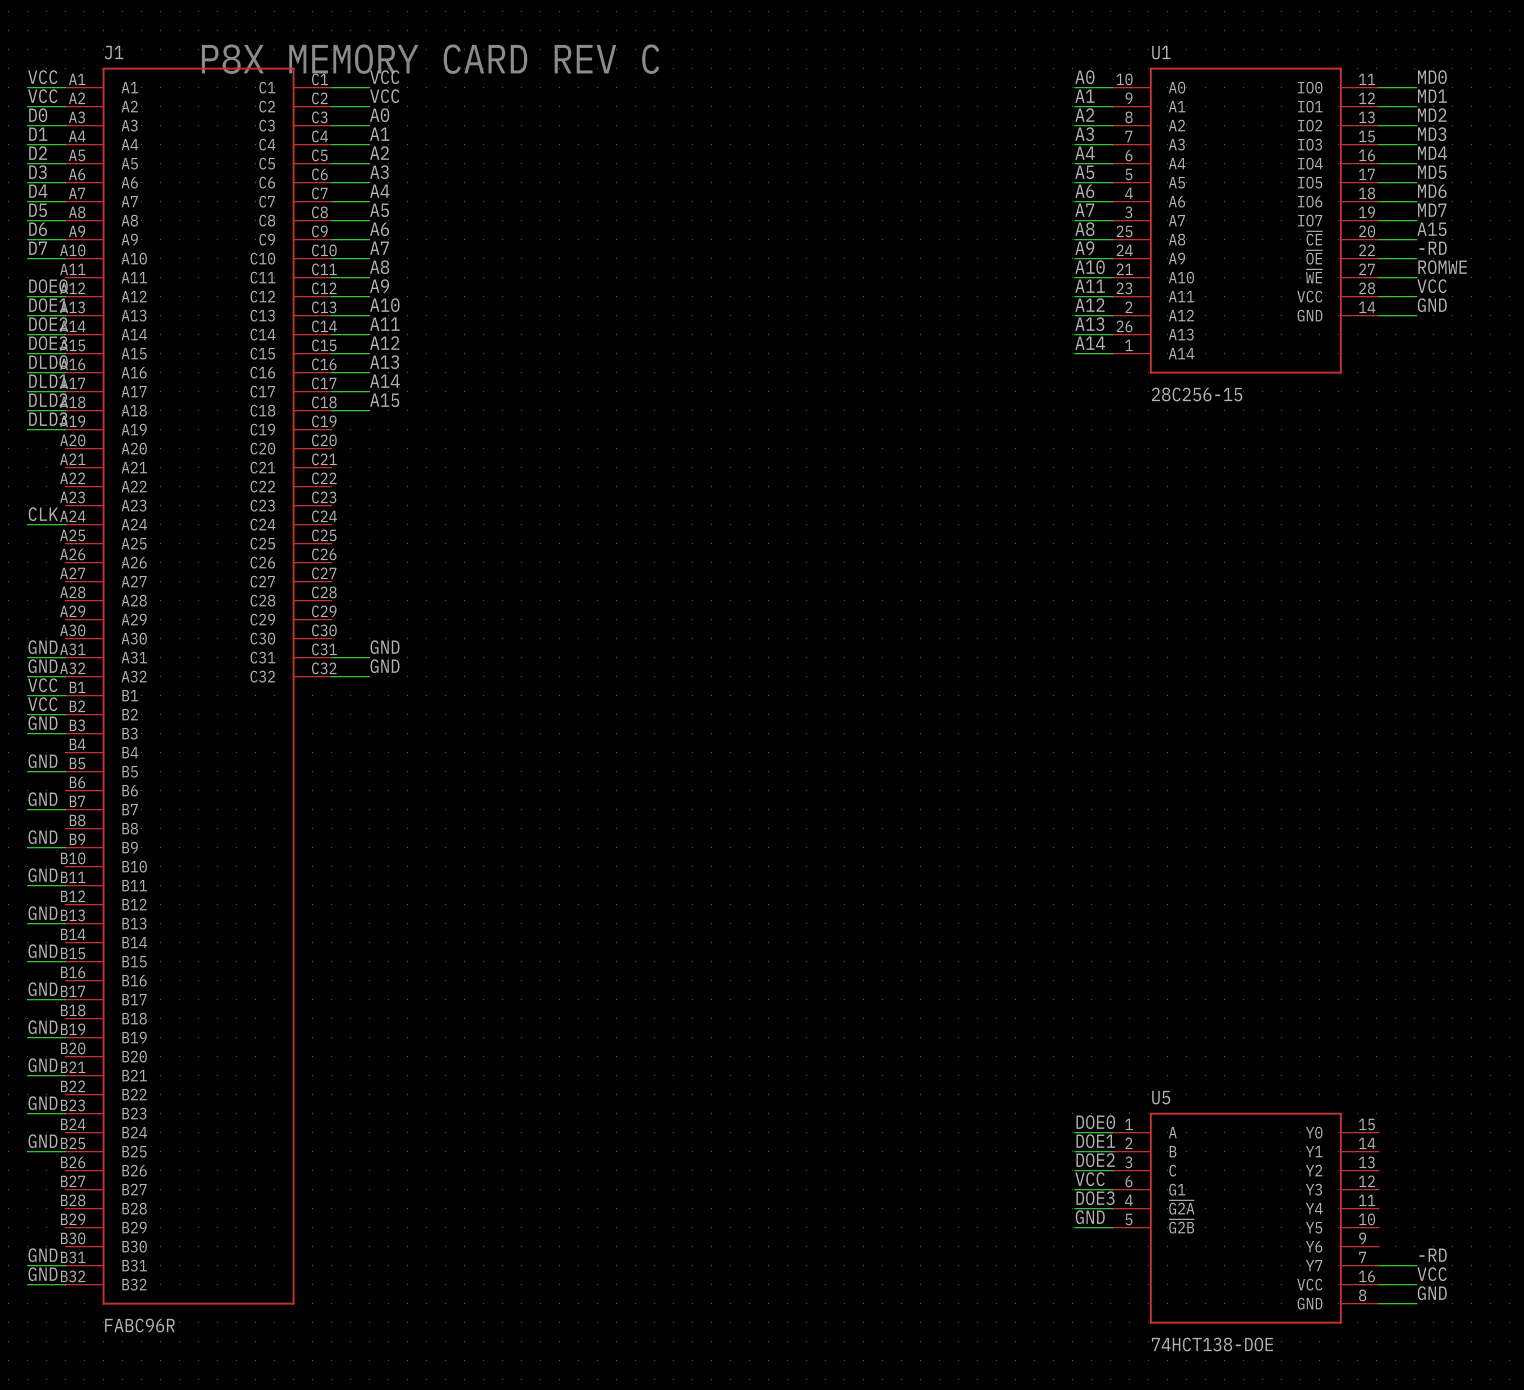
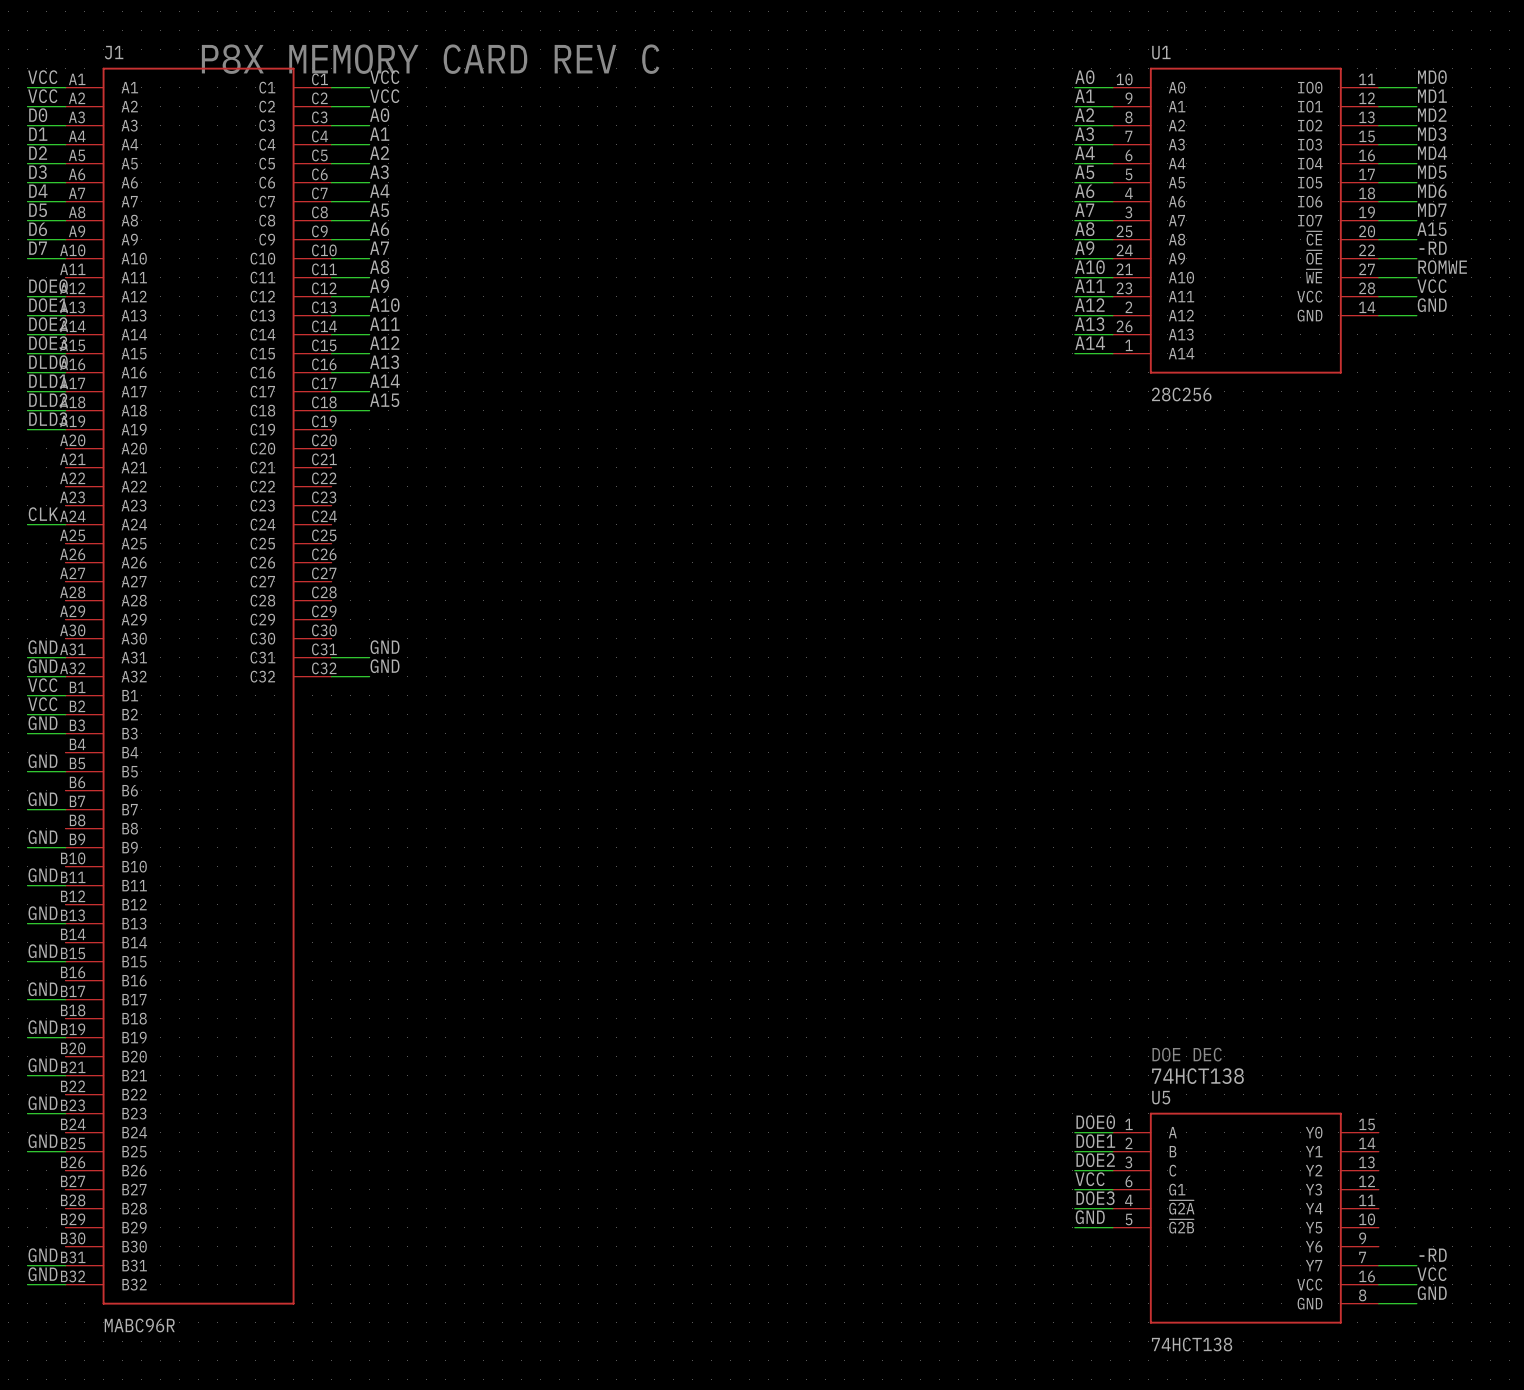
U1 value: 28C256-15 (1197, 394) -> 28C256 (1181, 394)
text: none -> DOE DEC (1187, 1054)
text: none -> 74HCT138 (1197, 1076)
J1 value: FABC96R (139, 1325) -> MABC96R (139, 1325)
U5 value: 74HCT138-DOE (1212, 1344) -> 74HCT138 (1192, 1344)

